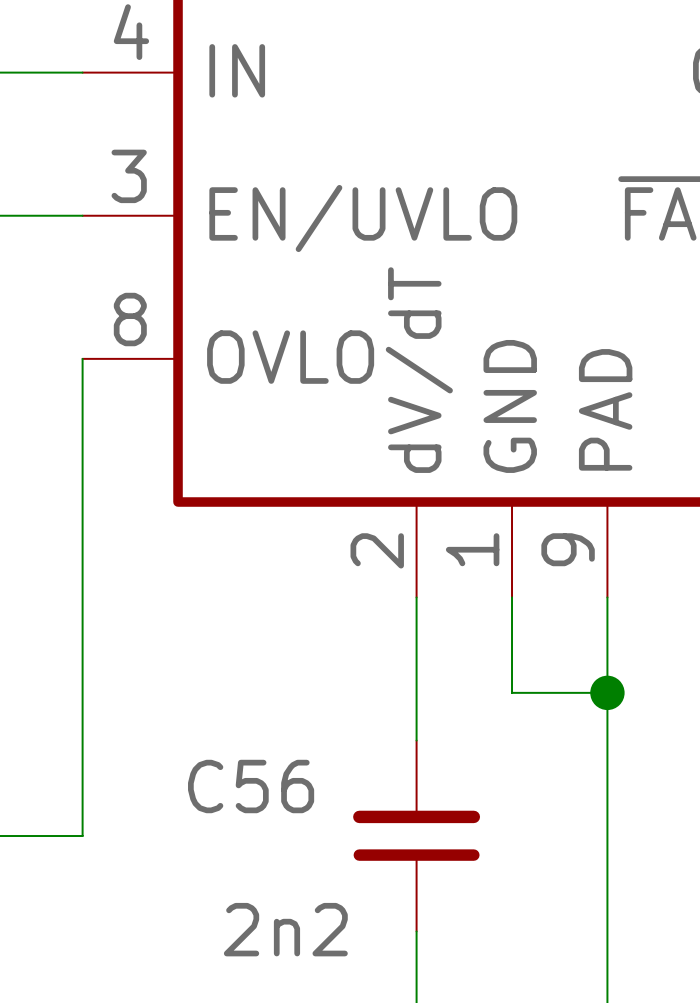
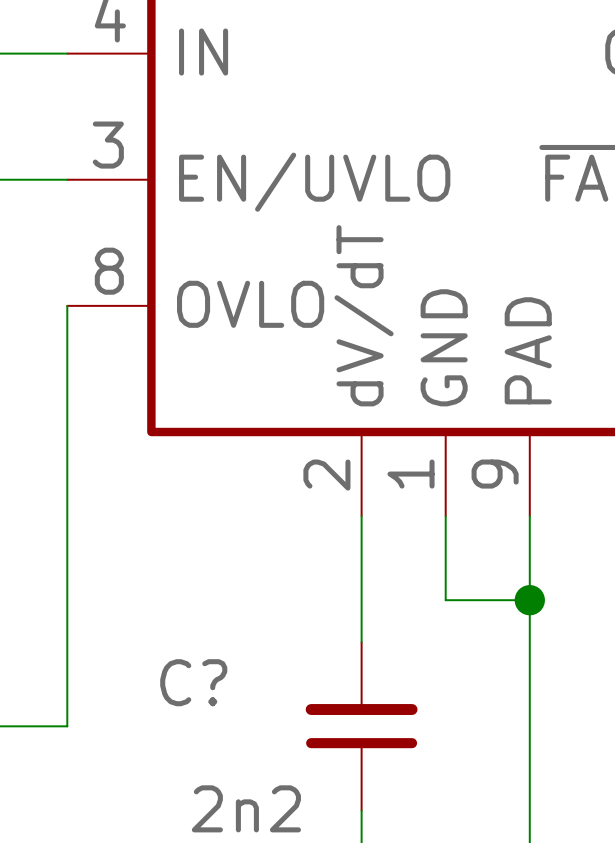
C56 name: C56 (251, 786) -> C? (193, 682)

